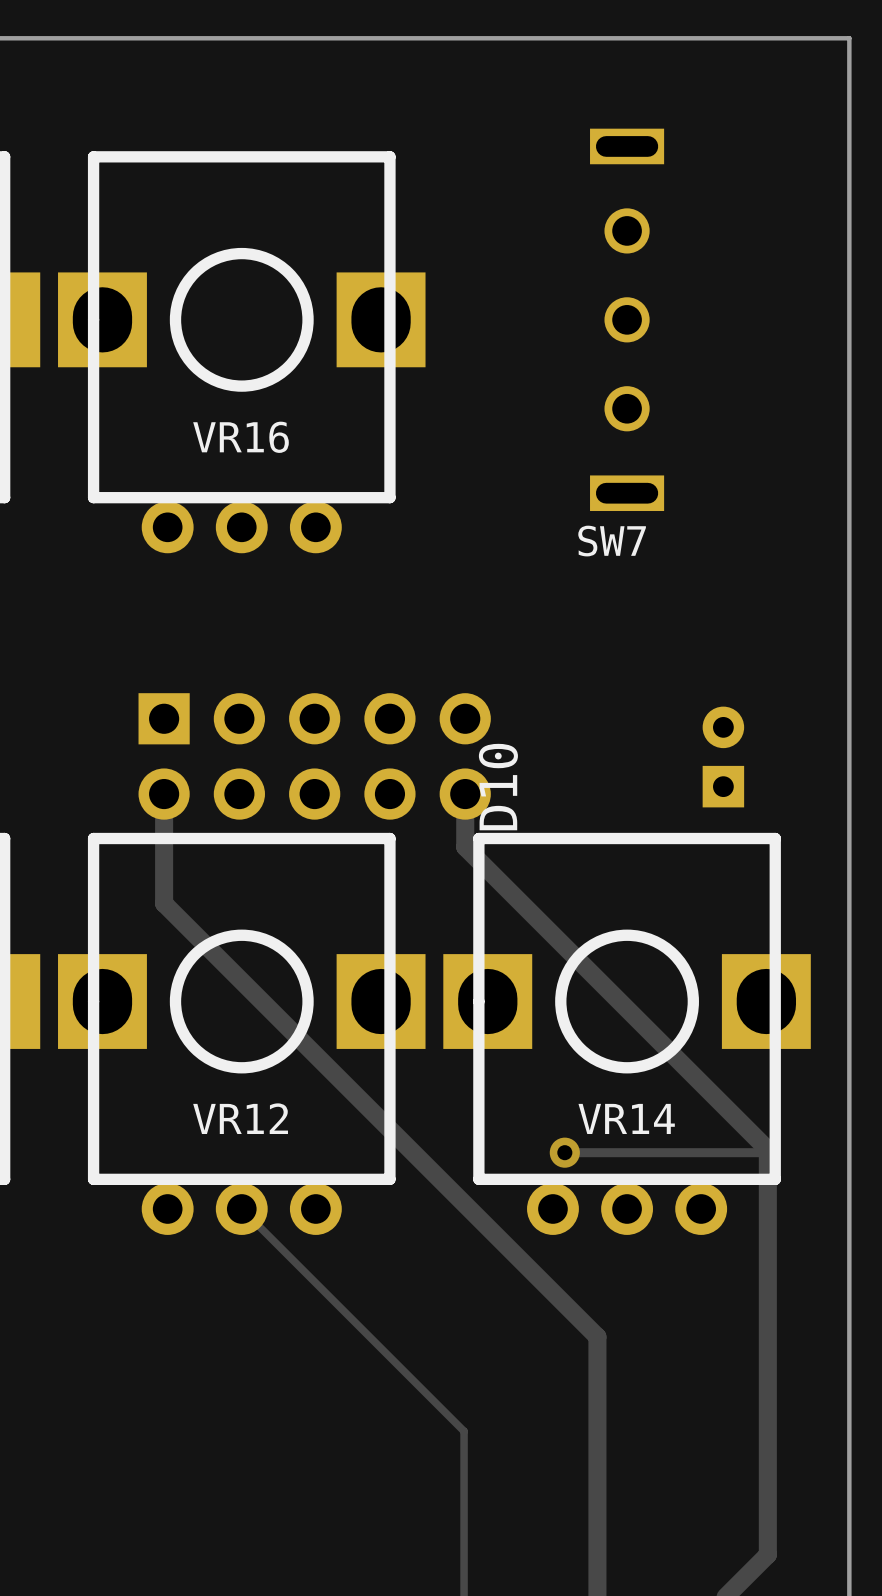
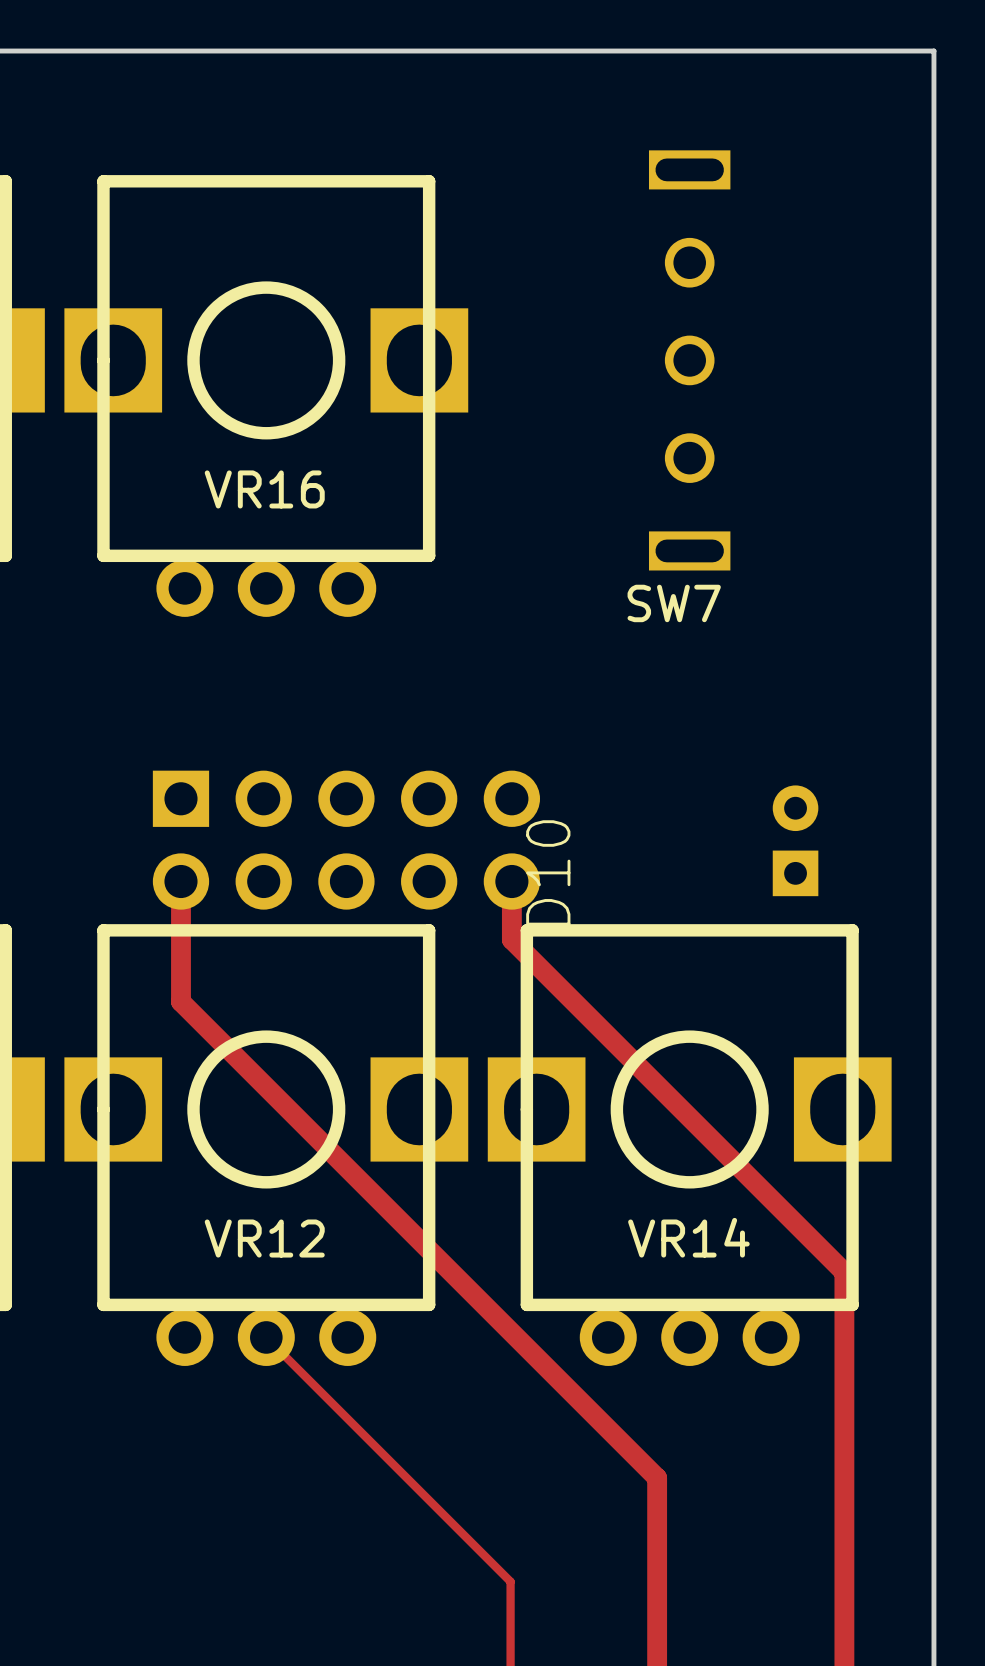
track: (767, 1149) (764, 1152) (564, 1152) -> none
via: (564, 1152) -> none

